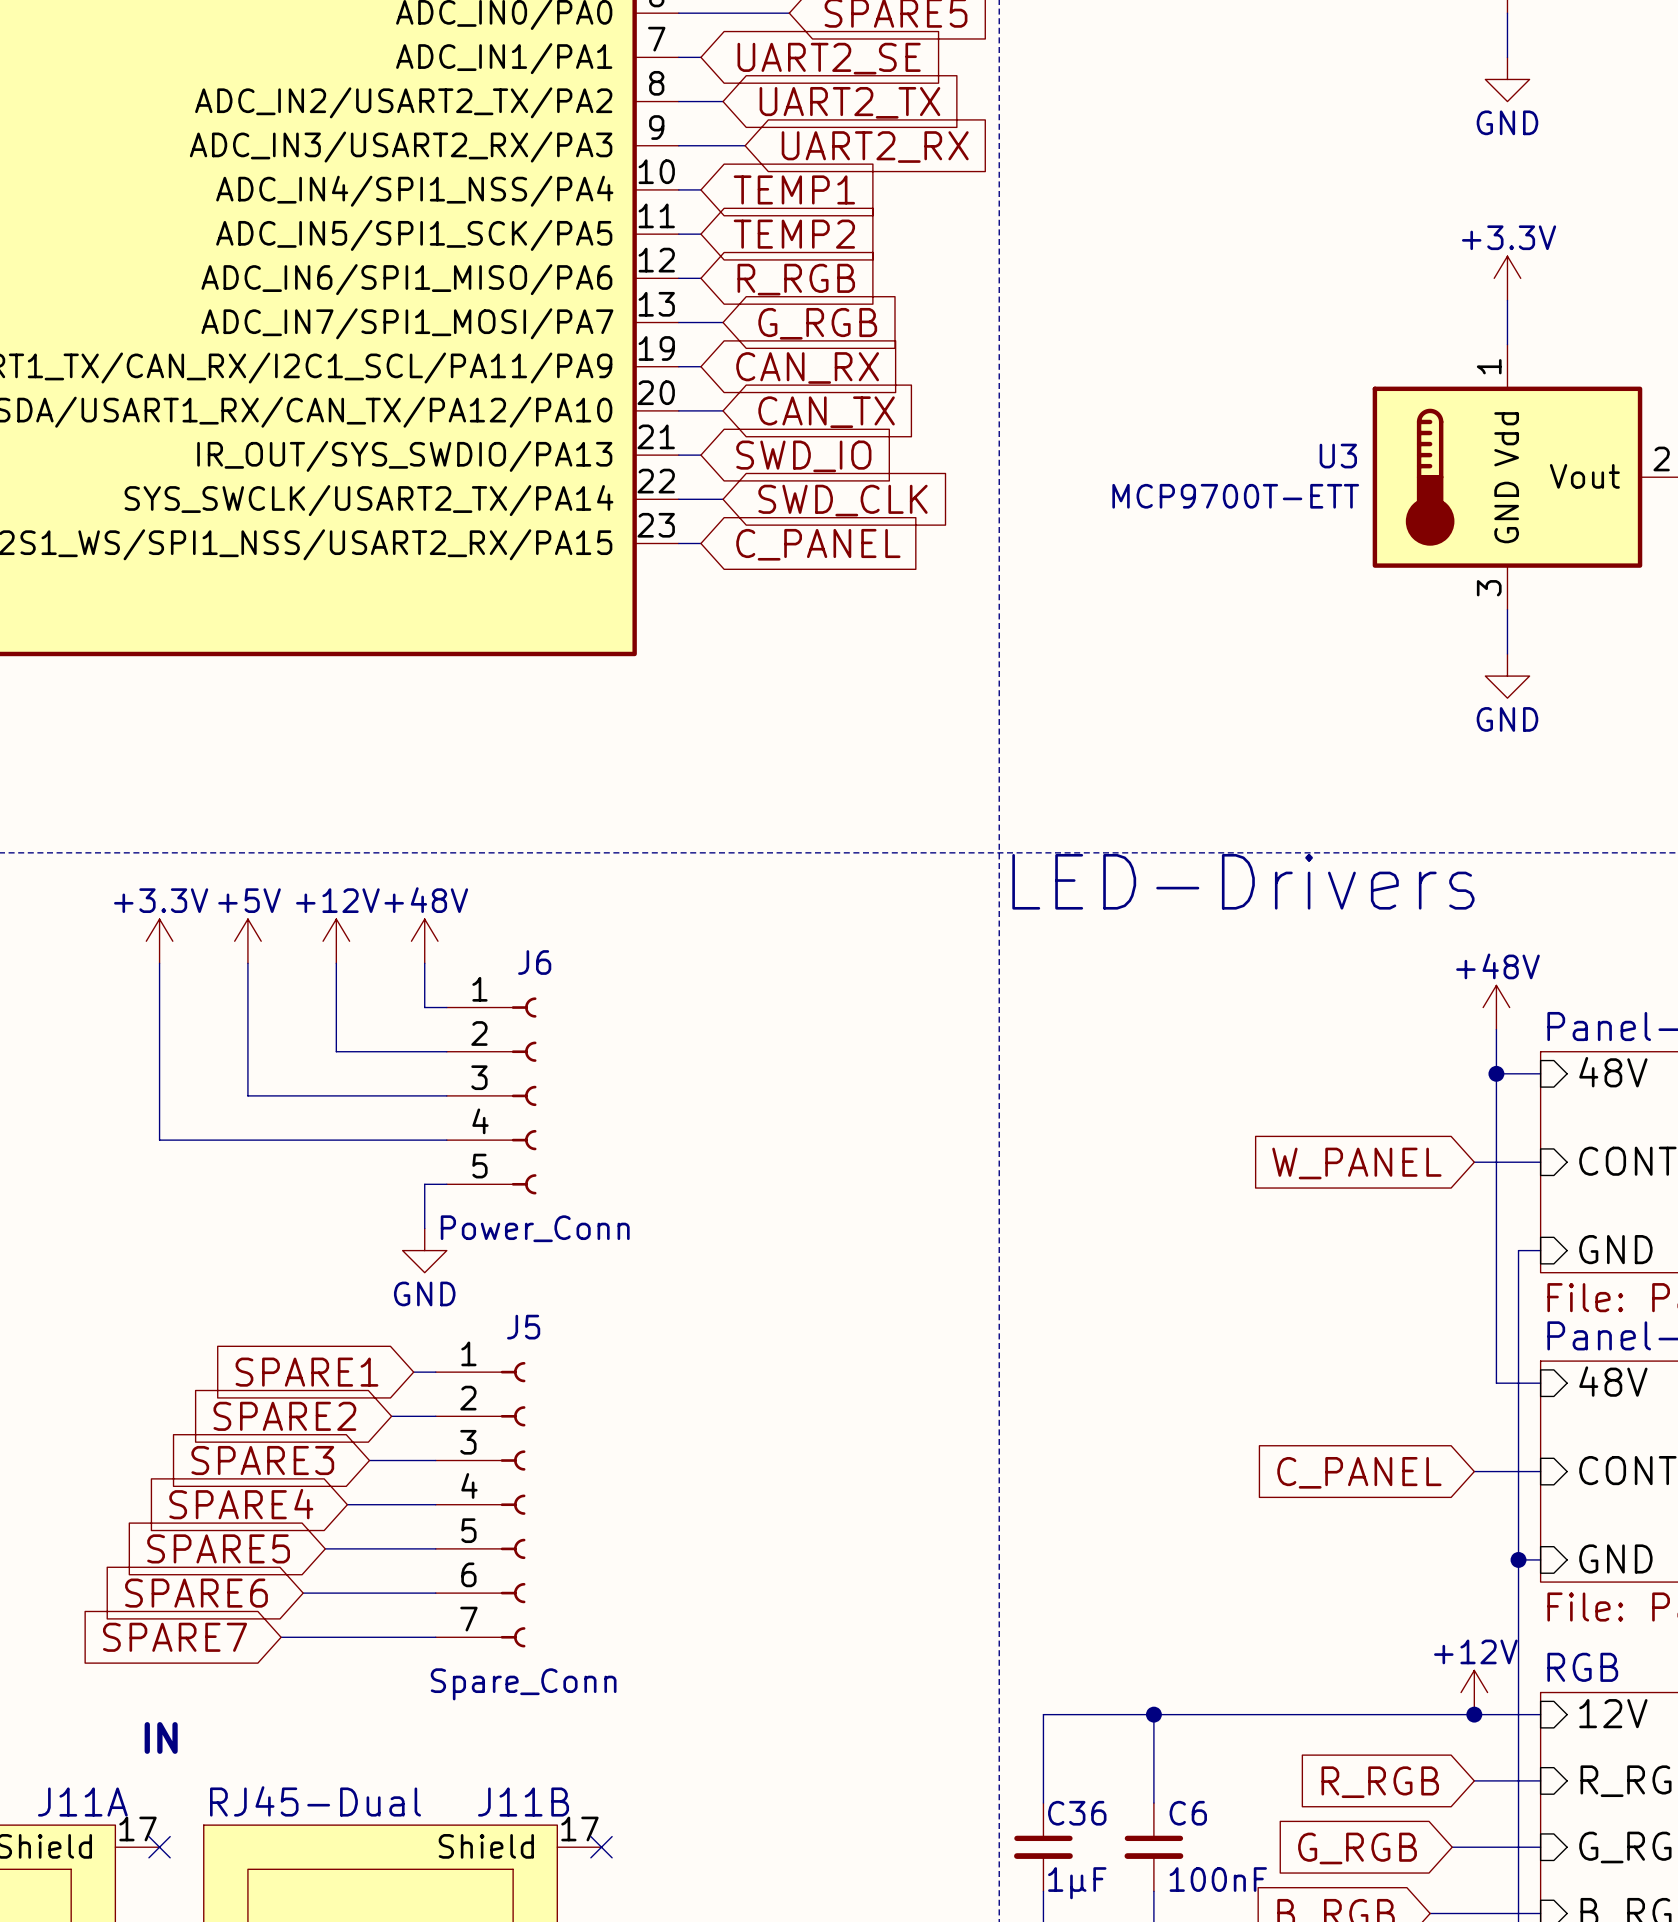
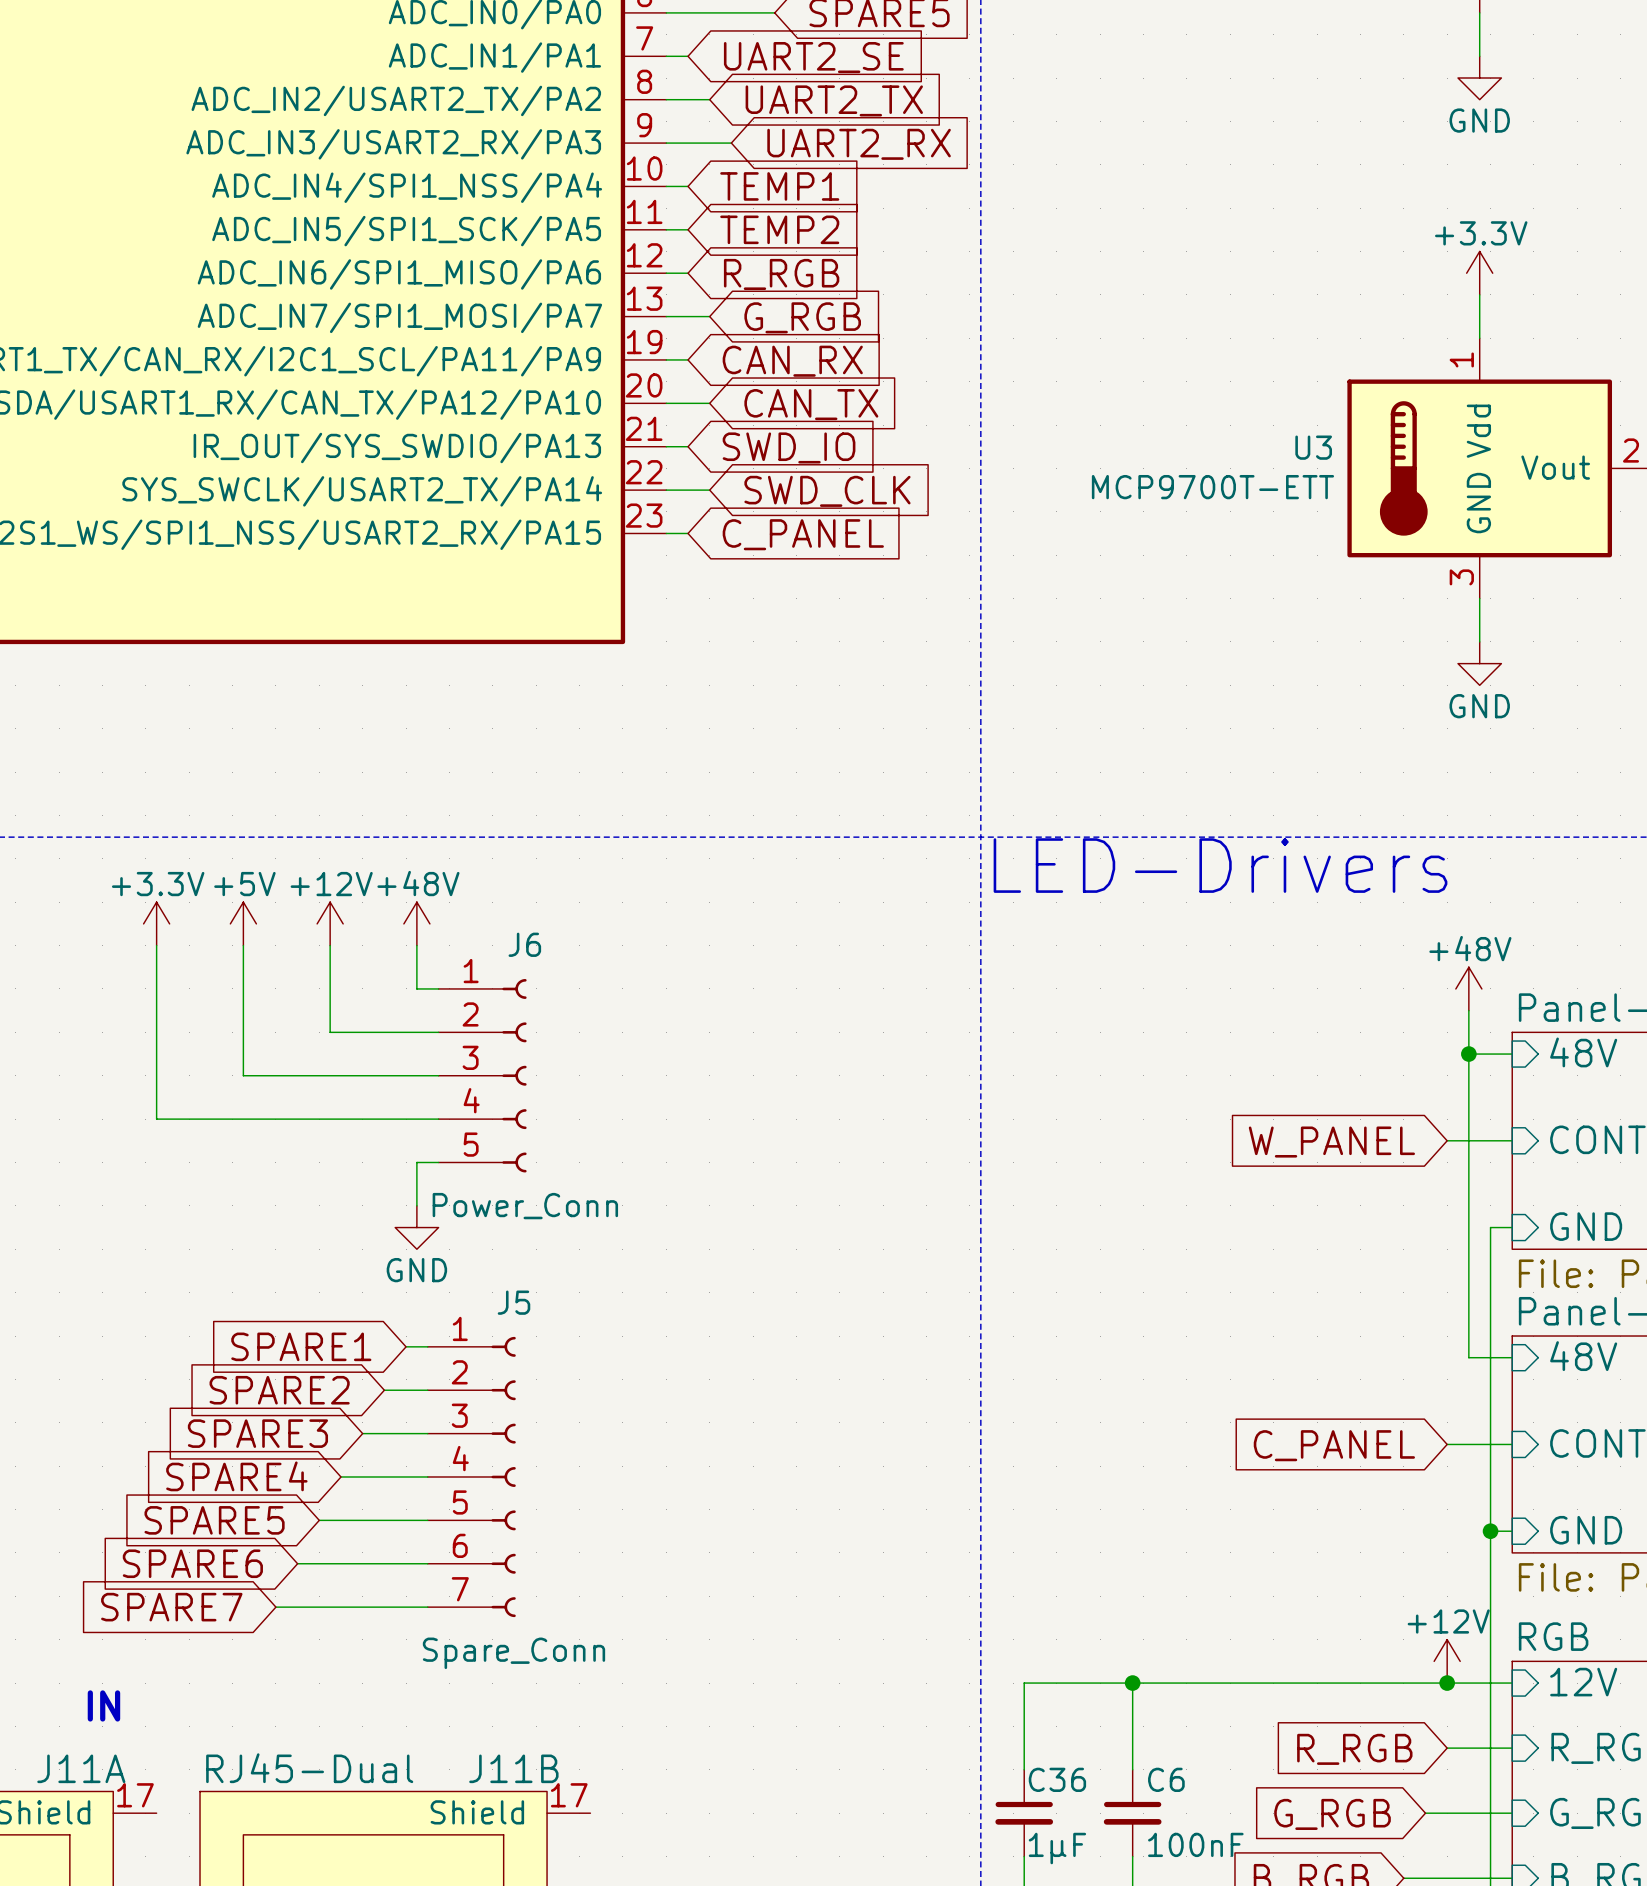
text position: IN (161, 1737) -> IN (103, 1705)
no-connect mark: (159, 1847) -> none
no-connect mark: (601, 1847) -> none

